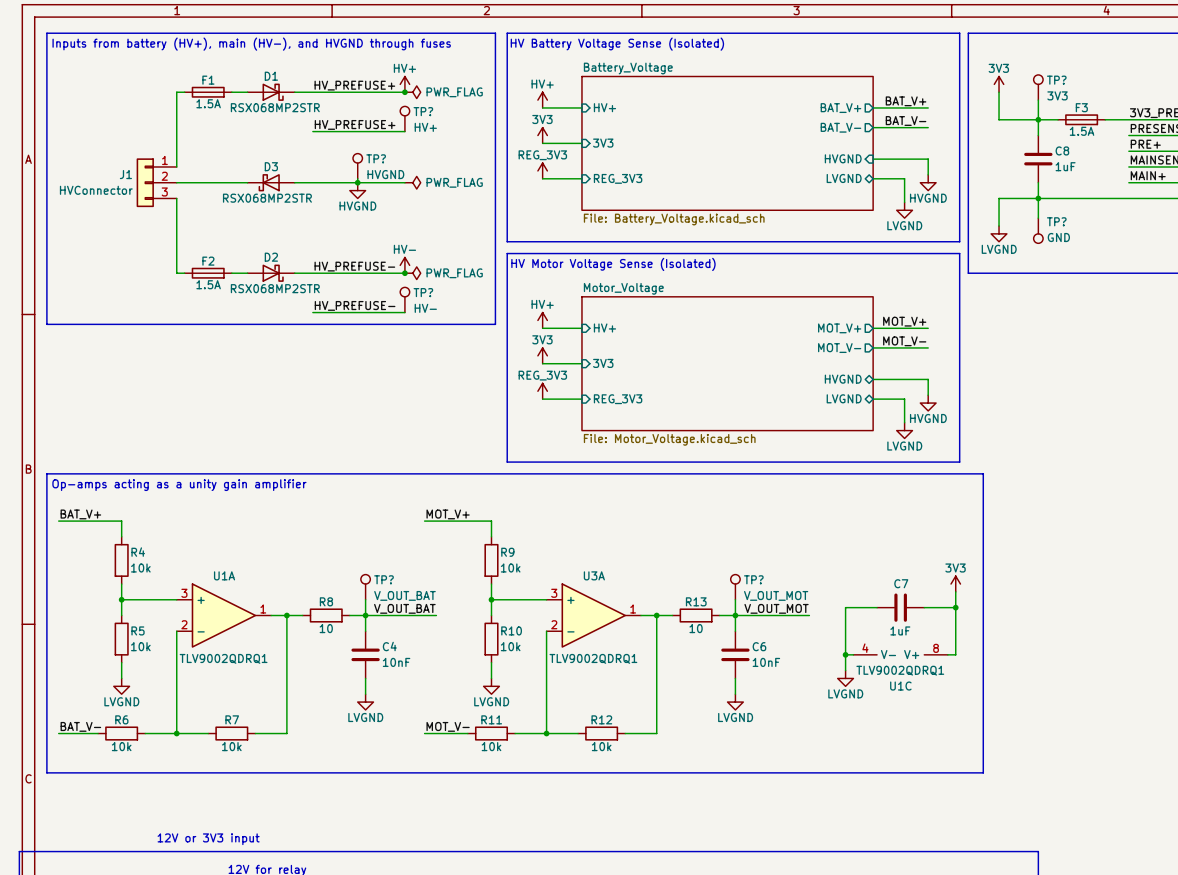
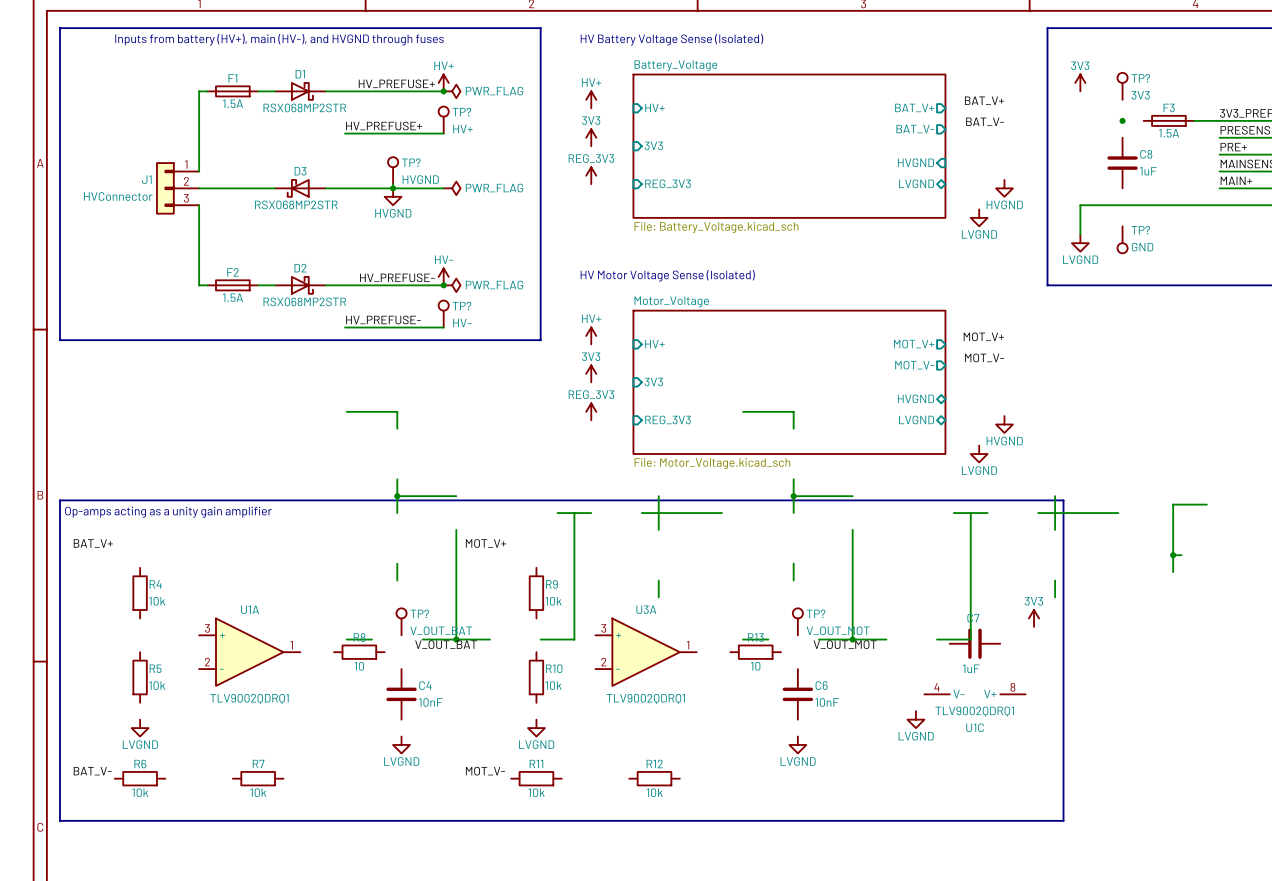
line: (507, 33) (959, 33) (959, 241) (507, 241) (507, 33) -> none
wire: (999, 92) (999, 119) (1058, 119) -> none
wire: (1038, 100) (1038, 135) -> none
wire: (542, 107) (581, 107) -> none
wire: (873, 107) (928, 107) -> none
wire: (873, 127) (928, 127) -> none
wire: (542, 143) (581, 143) -> none
wire: (873, 159) (928, 159) (928, 174) -> none
wire: (542, 178) (581, 178) -> none
wire: (873, 178) (904, 178) (904, 202) -> none
wire: (1038, 182) (1038, 218) -> none
junction: (1038, 198) -> none
line: (507, 253) (507, 462) (959, 462) (959, 253) (507, 253) -> none
wire: (542, 328) (581, 328) -> none
wire: (873, 328) (928, 328) -> none
wire: (873, 347) (928, 347) -> none
wire: (542, 363) (581, 363) -> none
wire: (873, 379) (928, 379) (928, 395) -> none
wire: none -> (346, 411) (397, 411) (397, 428)
wire: none -> (743, 411) (793, 411) (793, 428)
wire: (542, 399) (581, 399) -> none
wire: (873, 399) (904, 399) (904, 422) -> none
wire: none -> (397, 496) (456, 496)
junction: none -> (397, 496)
wire: none -> (658, 496) (658, 529)
wire: none -> (793, 496) (852, 496)
junction: none -> (793, 496)
wire: none -> (1055, 496) (1055, 529)
wire: none -> (1206, 504) (1173, 504) (1173, 572)
wire: none -> (557, 513) (591, 513)
wire: none -> (574, 513) (574, 639) (540, 639)
wire: none -> (641, 513) (721, 513)
wire: none -> (970, 513) (970, 639) (937, 639)
wire: none -> (1038, 513) (1118, 513)
wire: none -> (456, 529) (456, 639)
wire: none -> (852, 529) (852, 639)
wire: (58, 521) (121, 521) (121, 536) -> none
wire: (424, 521) (491, 521) (491, 536) -> none
wire: none -> (1173, 555) (1181, 555)
junction: none -> (1173, 555)
wire: none -> (658, 580) (658, 597)
wire: none -> (1055, 580) (1055, 597)
wire: (121, 584) (121, 615) -> none
wire: (491, 584) (491, 615) -> none
wire: (955, 591) (955, 654) (947, 654) -> none
wire: (121, 599) (176, 599) -> none
junction: (121, 599) -> none
wire: (365, 599) (365, 631) -> (397, 479) (397, 513)
wire: (491, 599) (546, 599) -> none
junction: (491, 599) -> none
wire: (735, 599) (735, 631) -> (793, 479) (793, 513)
wire: none -> (346, 639) (372, 639)
wire: none -> (422, 639) (490, 639)
junction: none -> (456, 639)
wire: none -> (743, 639) (768, 639)
wire: none -> (818, 639) (886, 639)
junction: none -> (852, 639)
wire: (877, 607) (845, 607) (845, 670) -> none
wire: (924, 607) (955, 607) -> (953, 513) (987, 513)
junction: (955, 607) -> none
wire: (271, 615) (302, 615) -> none
wire: (286, 615) (286, 733) (255, 733) -> none
junction: (286, 615) -> none
wire: (349, 615) (436, 615) -> none
junction: (365, 615) -> none
wire: (640, 615) (672, 615) -> none
wire: (656, 615) (656, 733) (625, 733) -> none
junction: (656, 615) -> none
wire: (719, 615) (809, 615) -> none
junction: (735, 615) -> none
wire: (176, 631) (176, 733) -> none
wire: (546, 631) (546, 733) -> none
wire: (845, 654) (853, 654) -> none
junction: (845, 654) -> none
wire: (121, 662) (121, 678) -> none
wire: (491, 662) (491, 678) -> none
wire: (365, 678) (365, 694) -> (397, 563) (397, 580)
wire: (735, 678) (735, 694) -> (793, 563) (793, 580)
wire: (58, 733) (98, 733) -> none
wire: (145, 733) (208, 733) -> none
junction: (176, 733) -> none
wire: (424, 733) (467, 733) -> none
wire: (515, 733) (578, 733) -> none
junction: (546, 733) -> none

